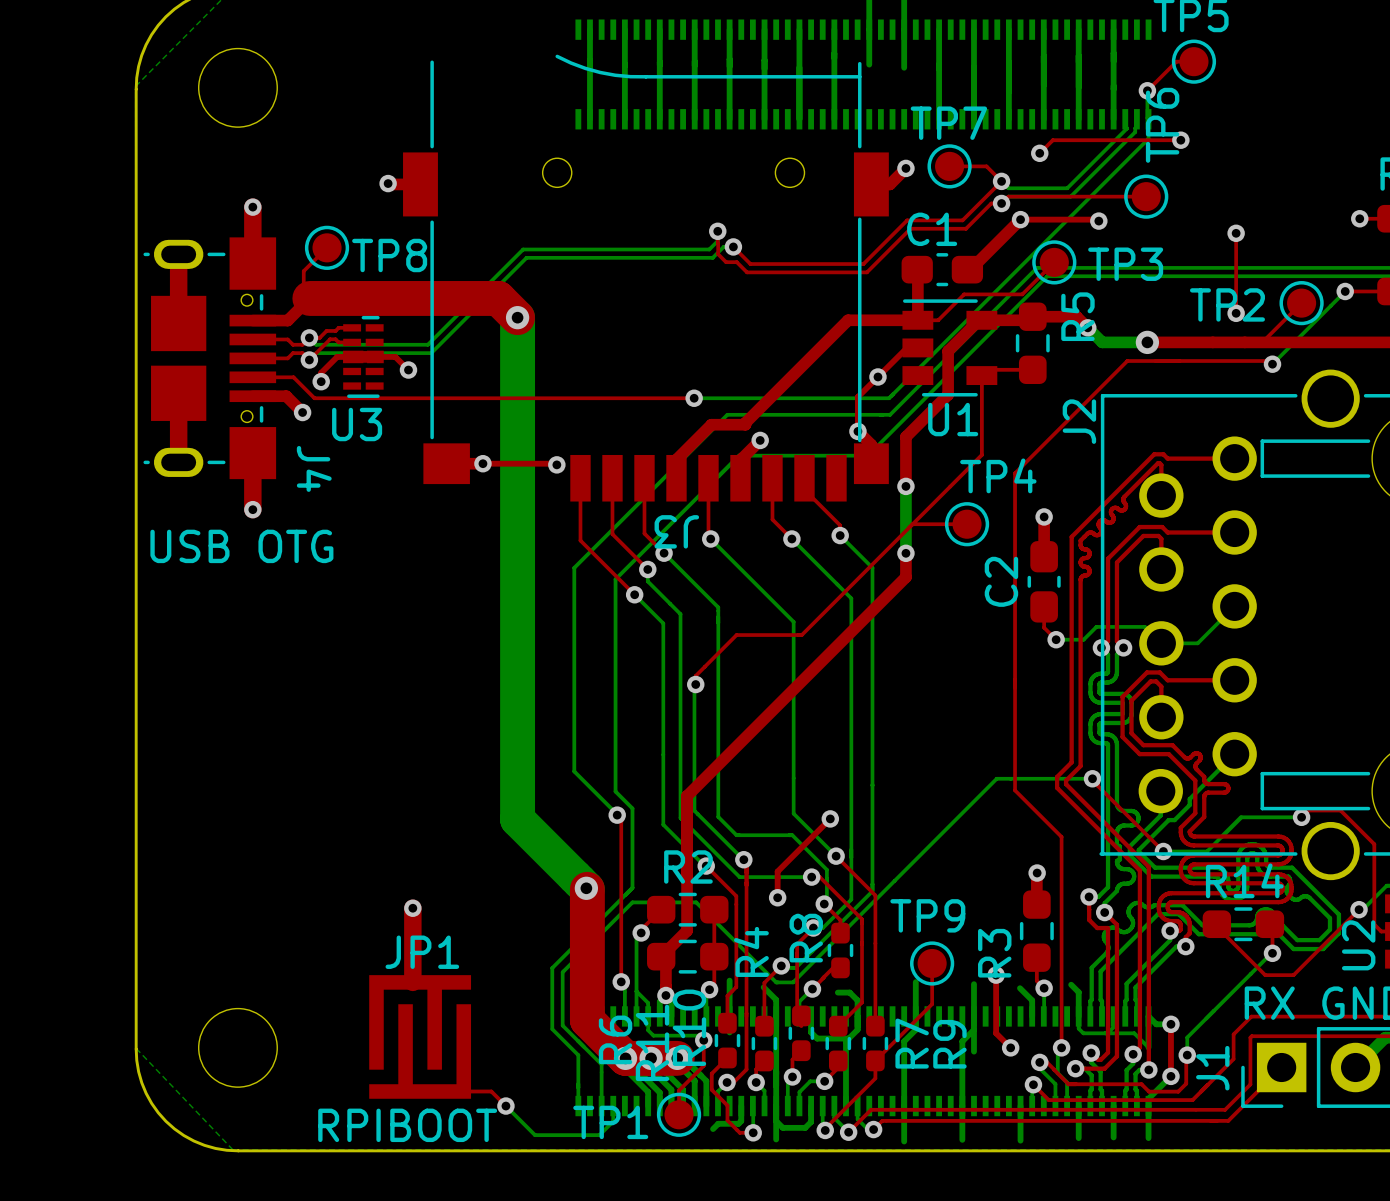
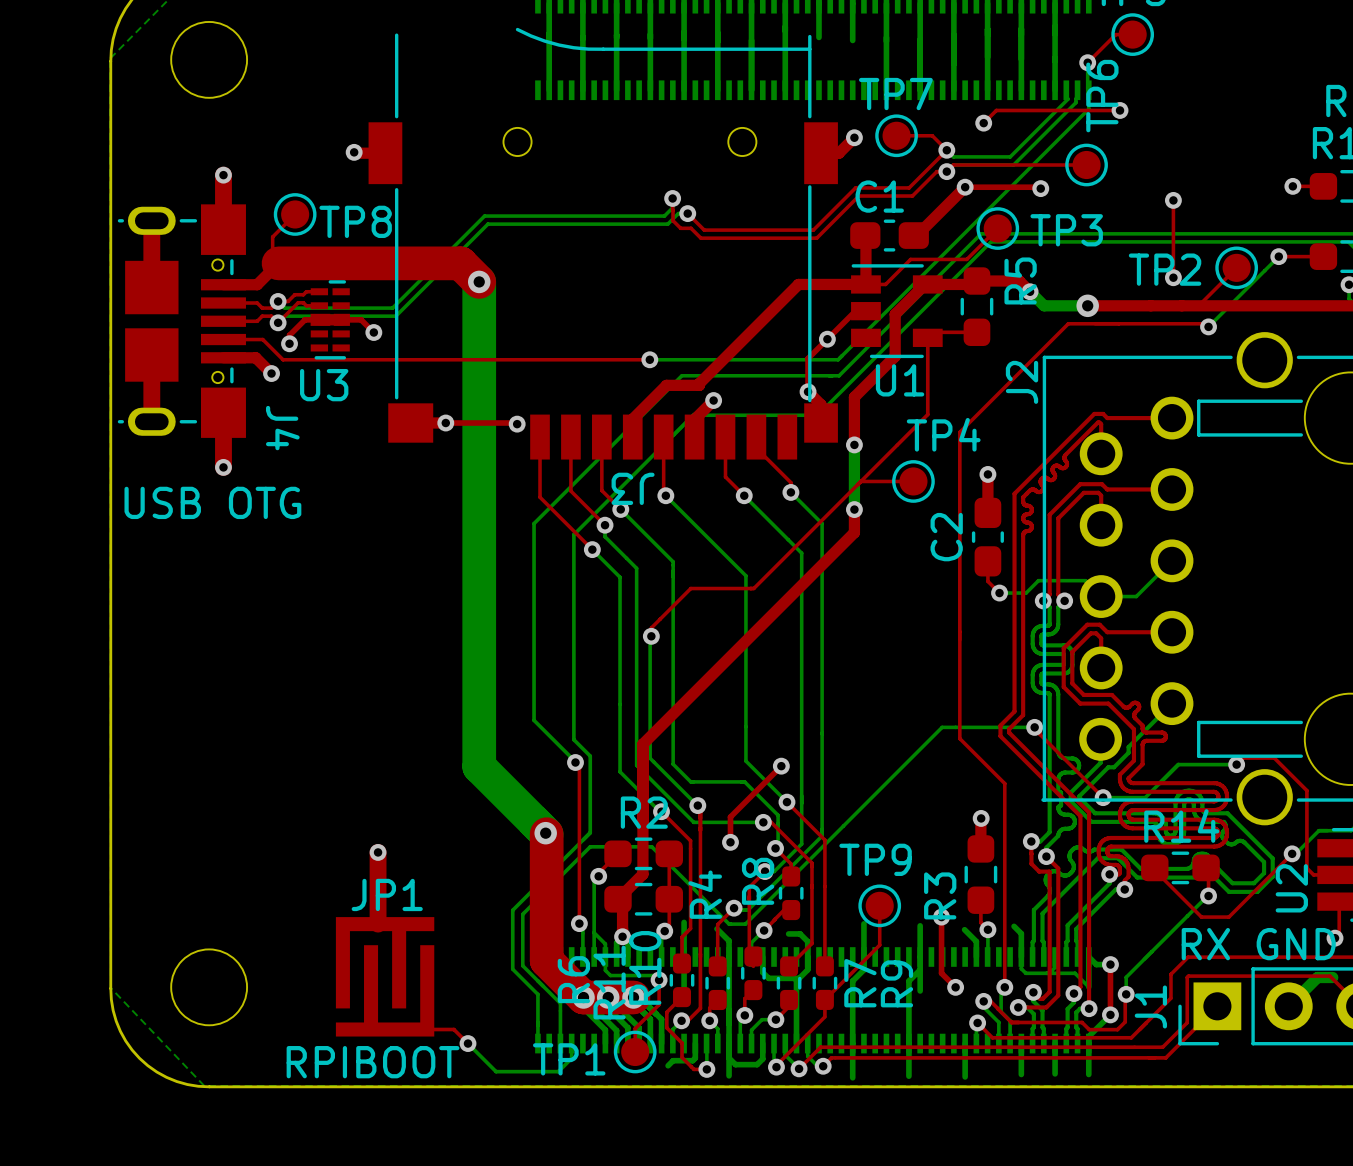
bottom track: none -> (684, 972) (684, 995)

